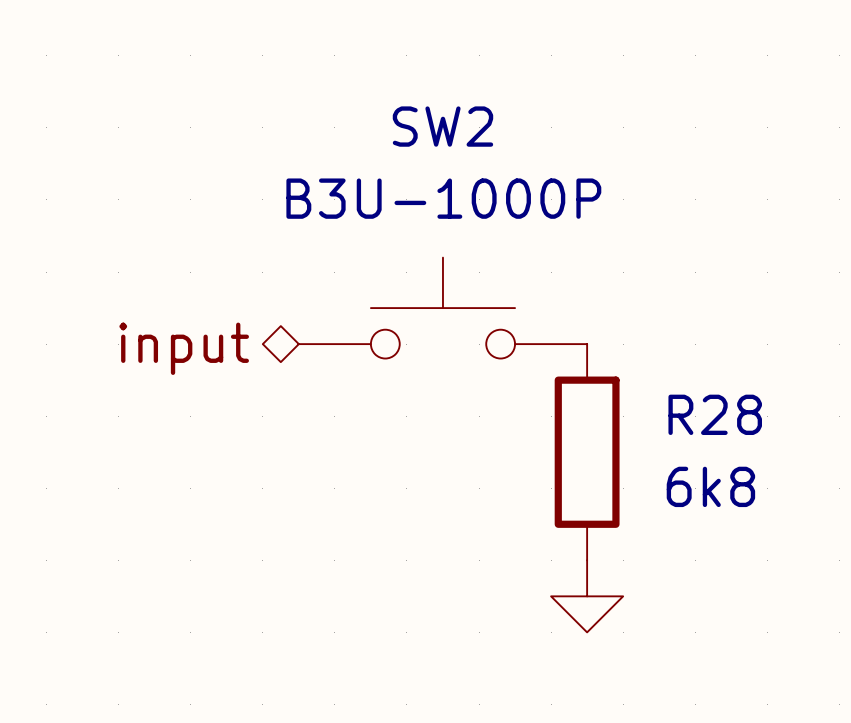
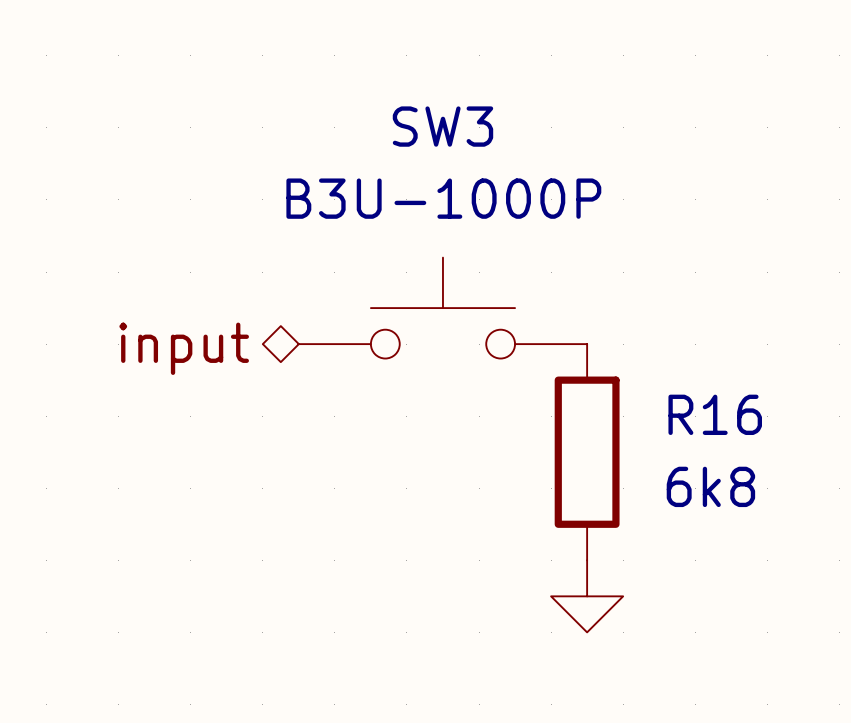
SW2 name: SW2 (442, 126) -> SW3 (442, 126)
R28 name: R28 (715, 414) -> R16 (715, 414)

